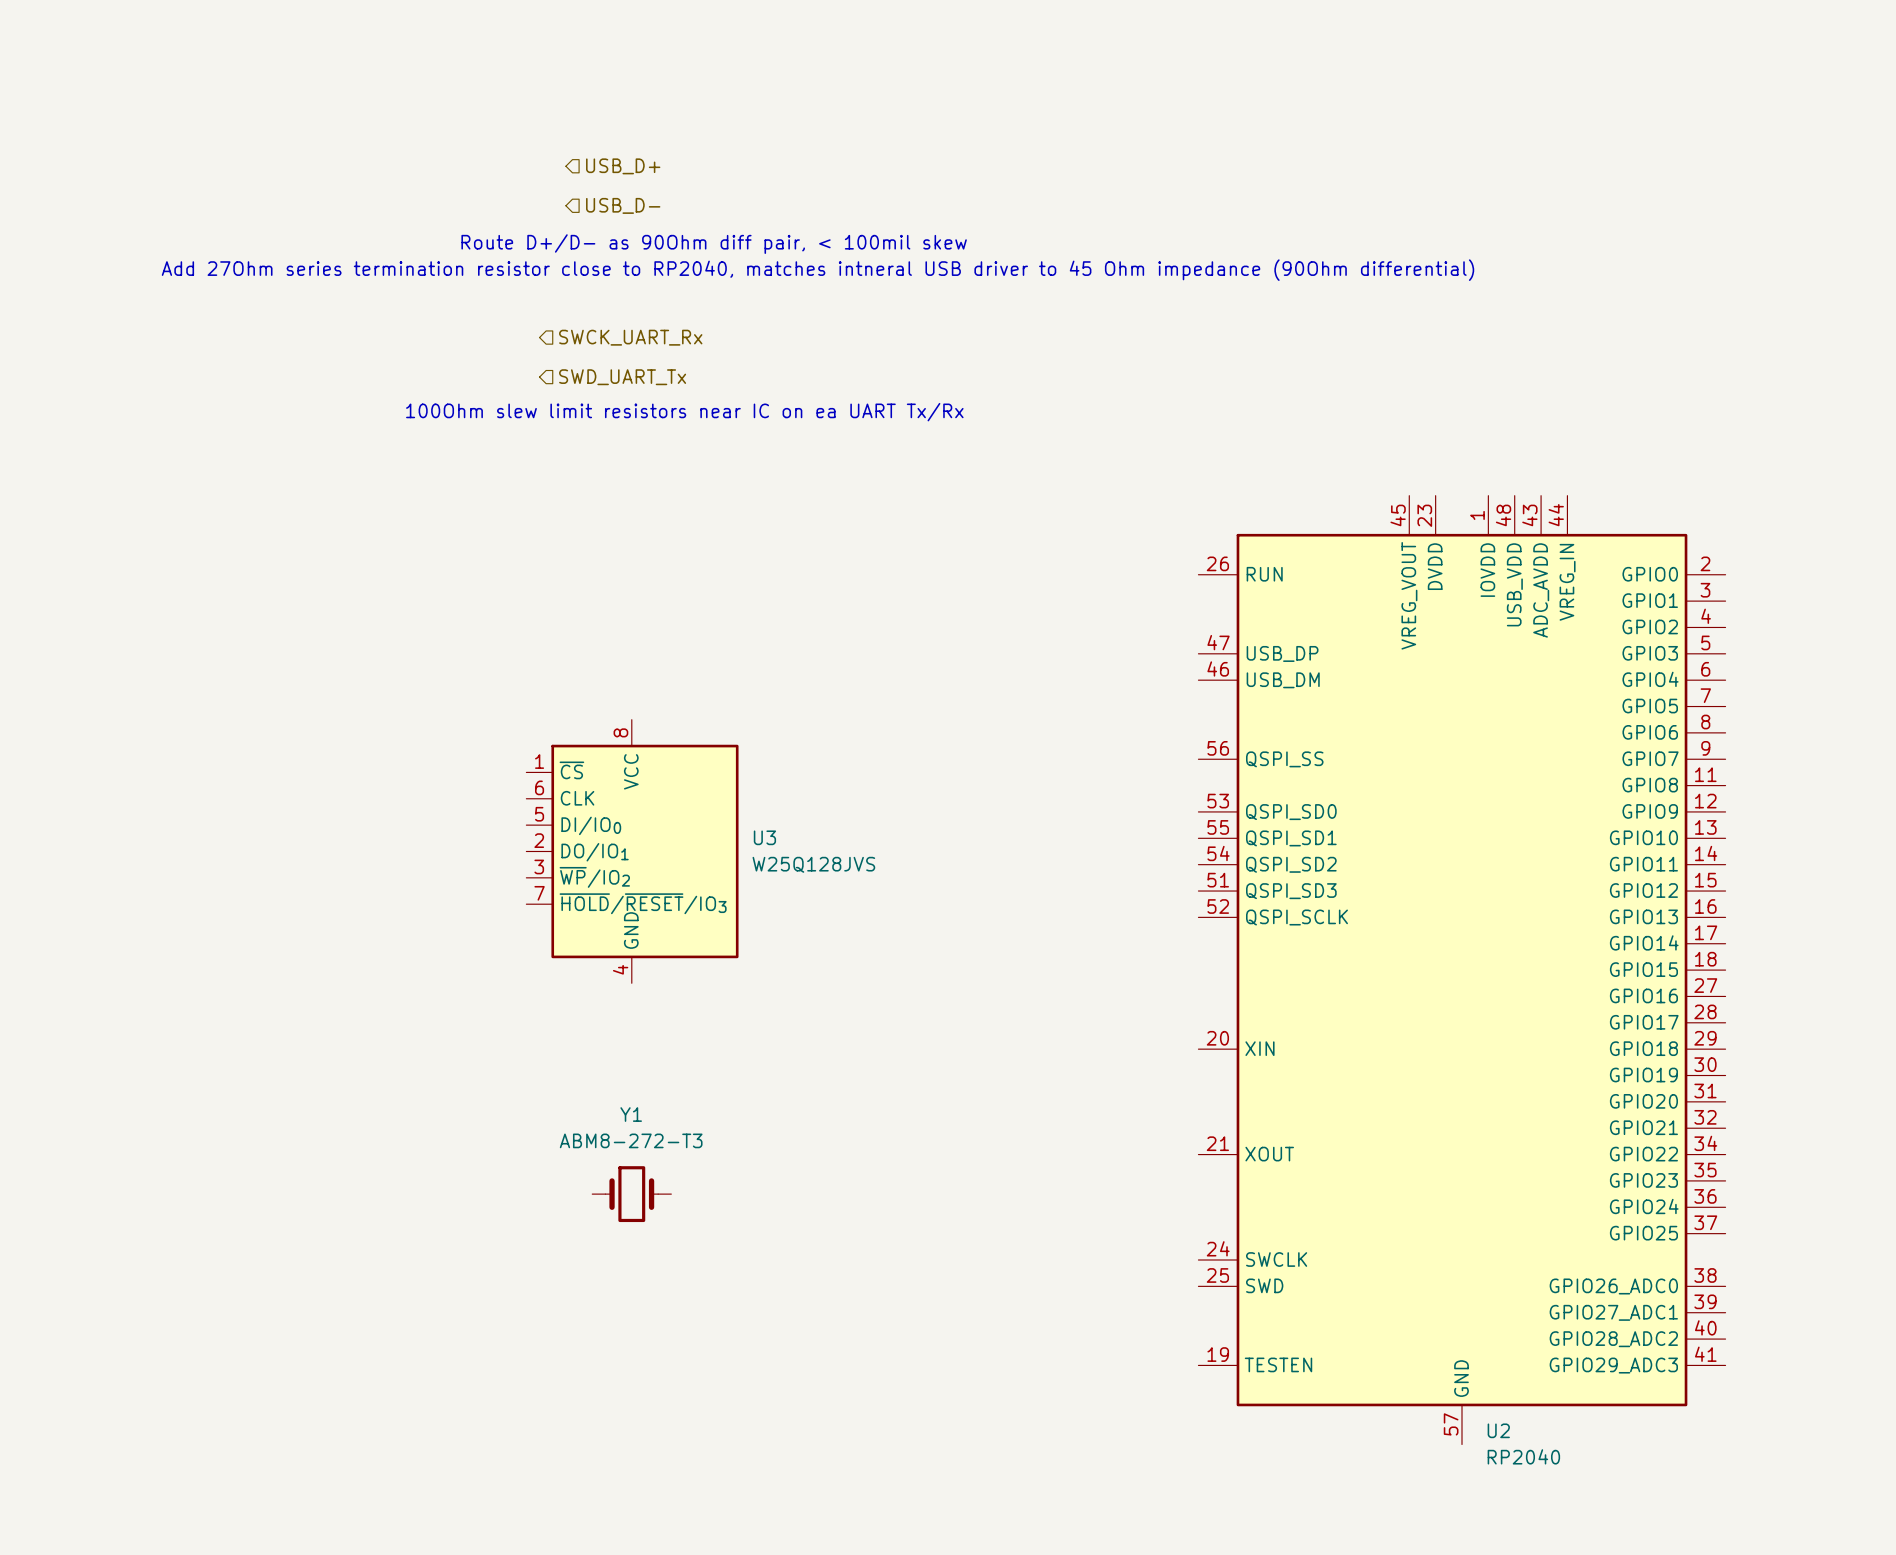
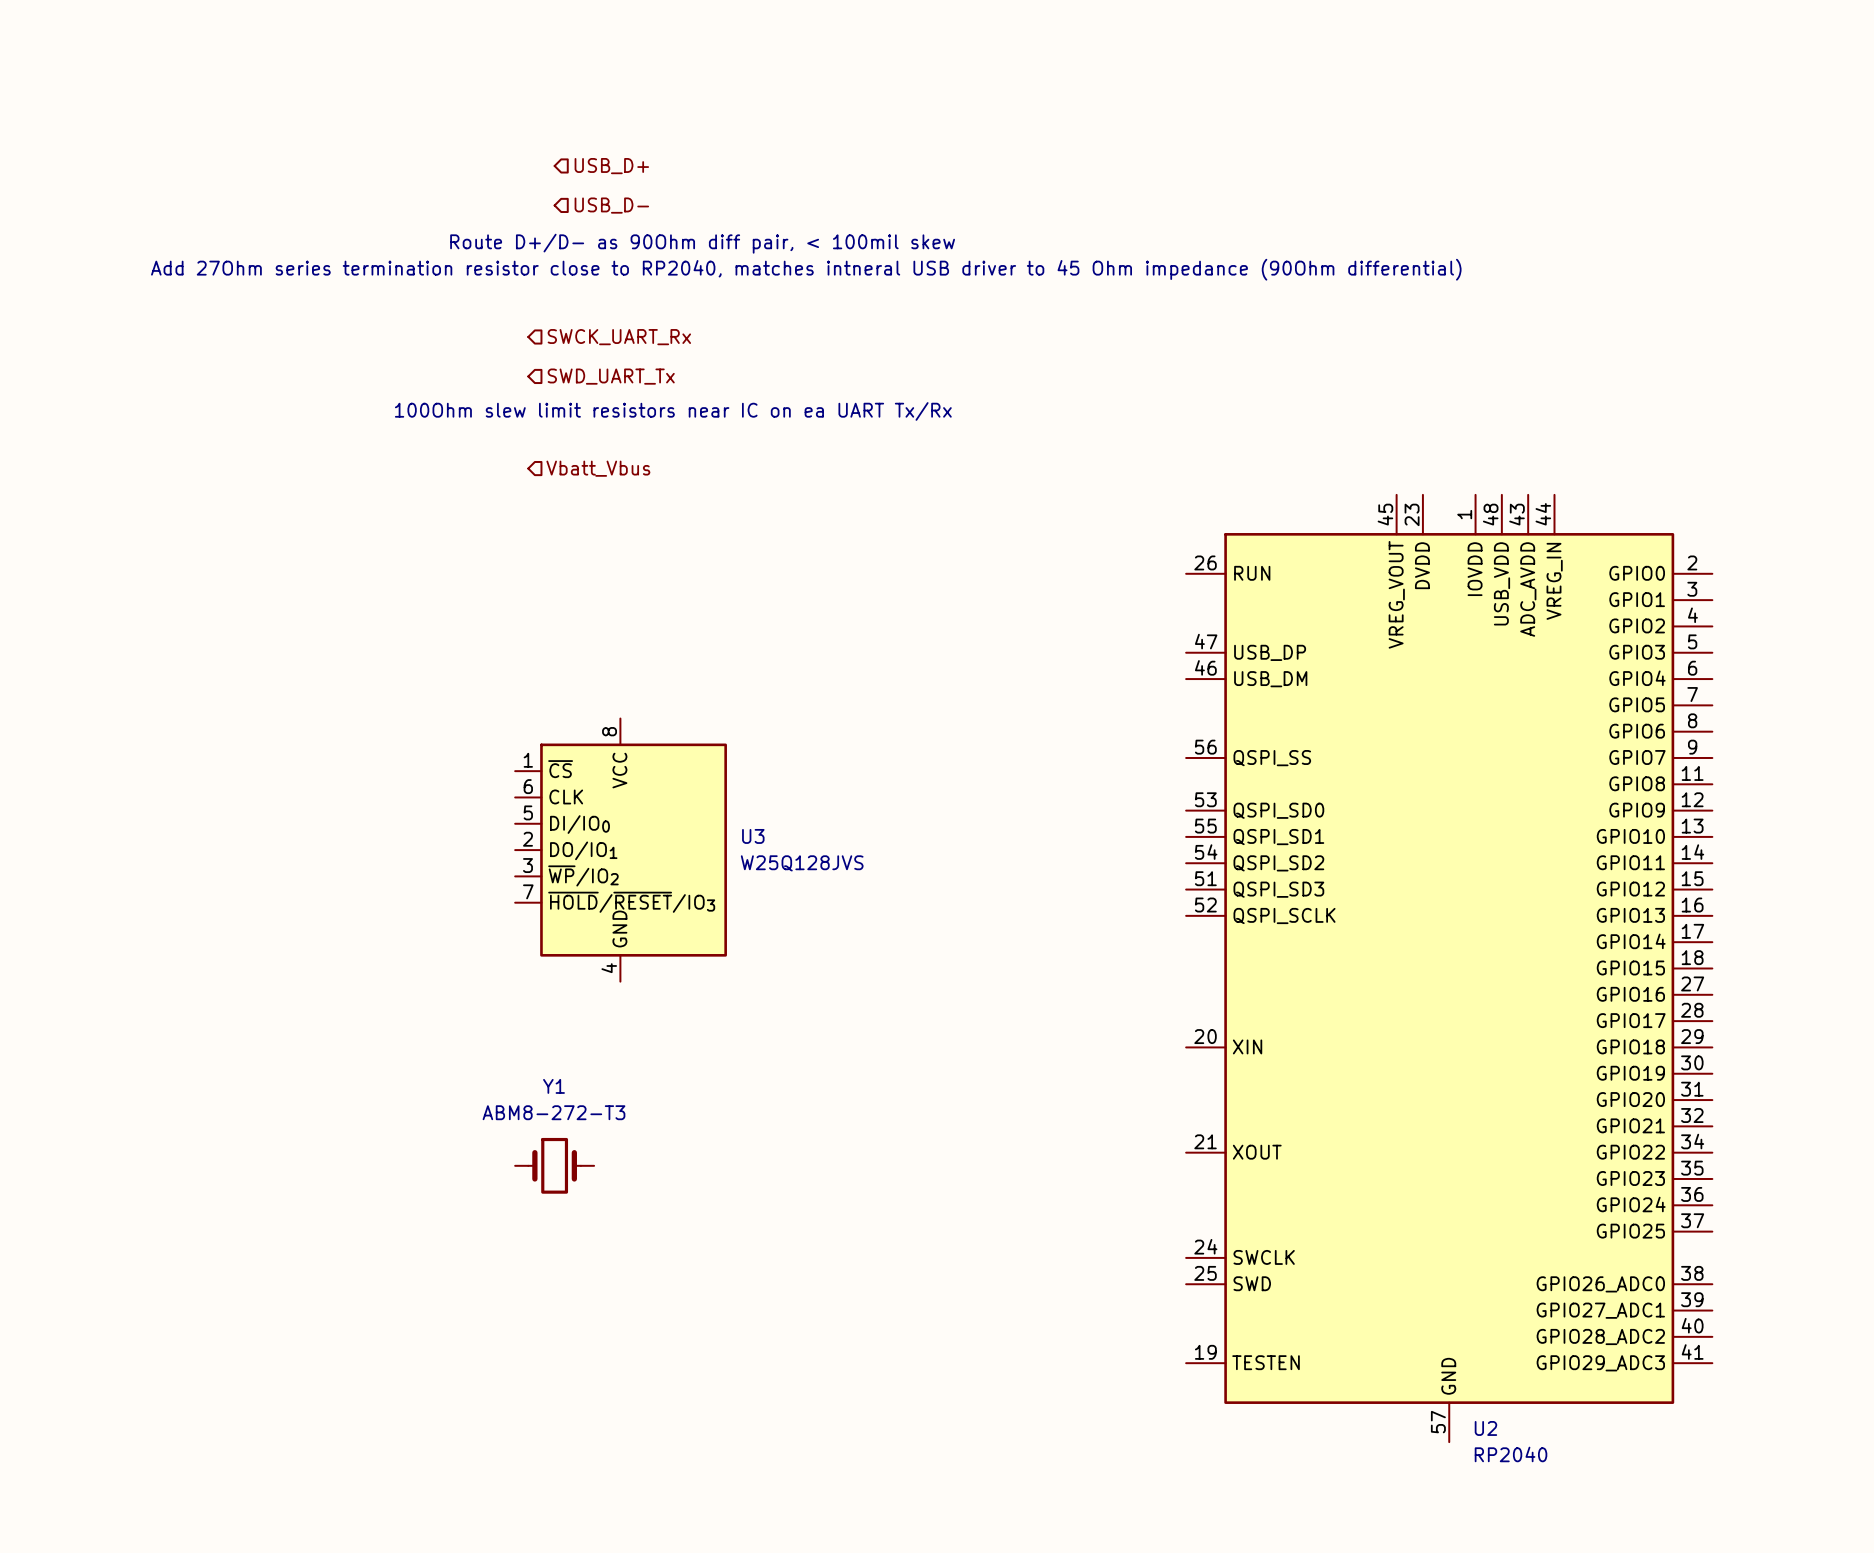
hierarchical label: none -> Vbatt_Vbus (598, 468)
Y1 position: (631, 1194) -> (554, 1165)

